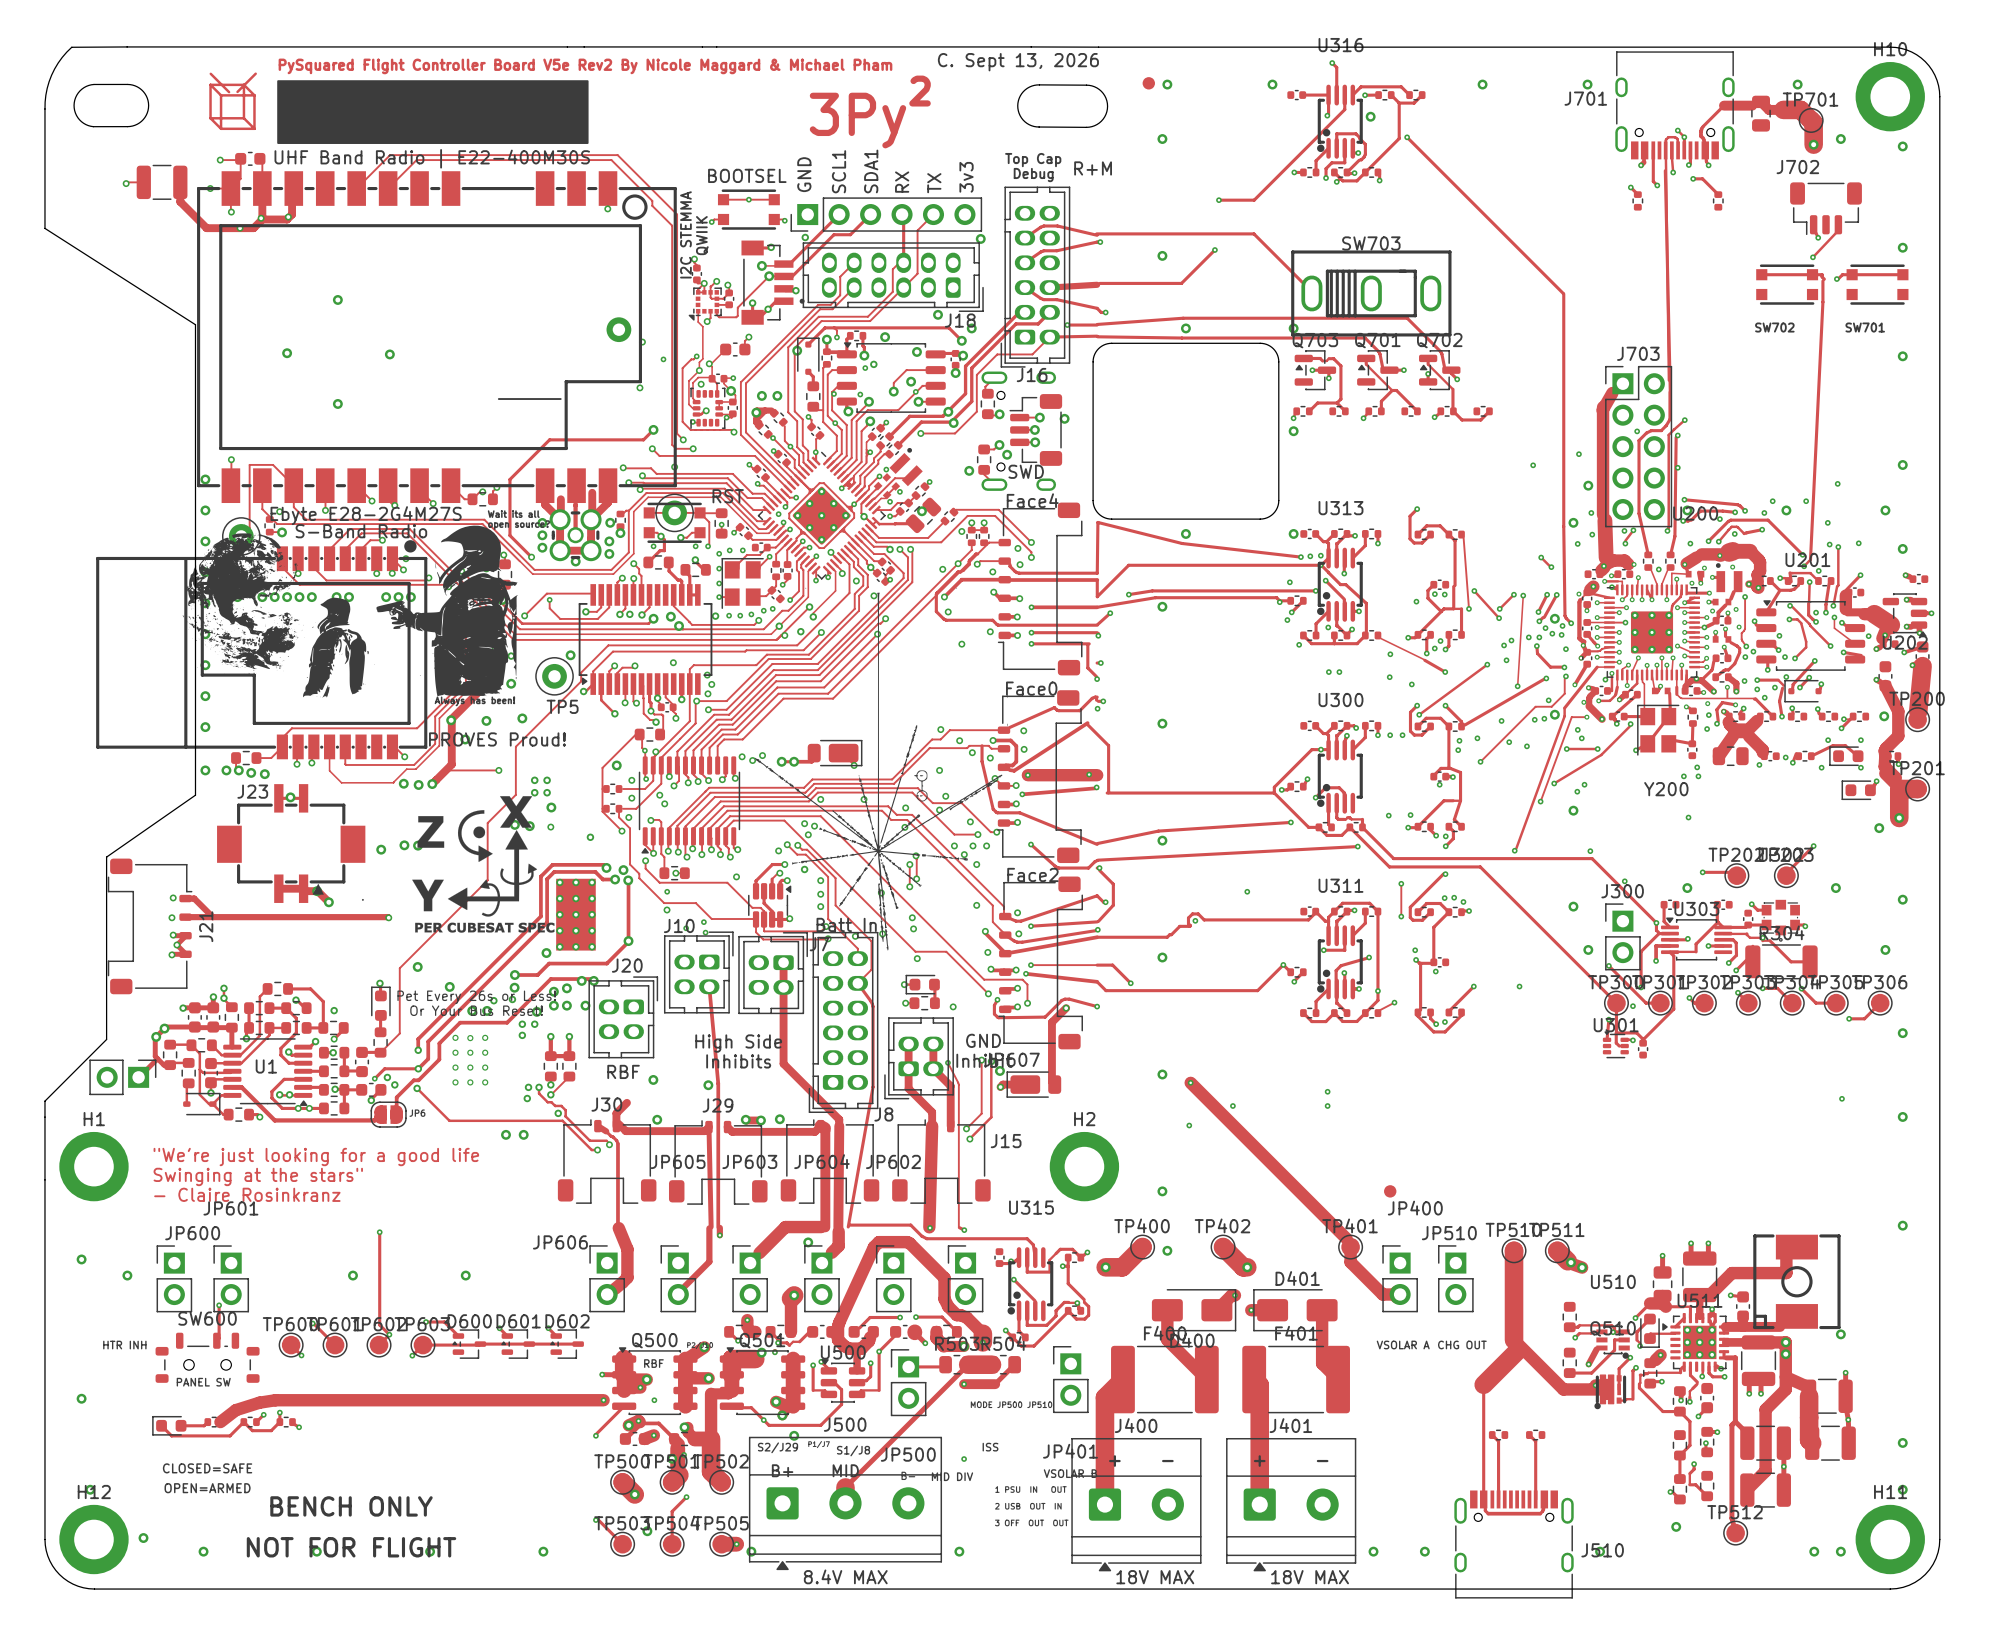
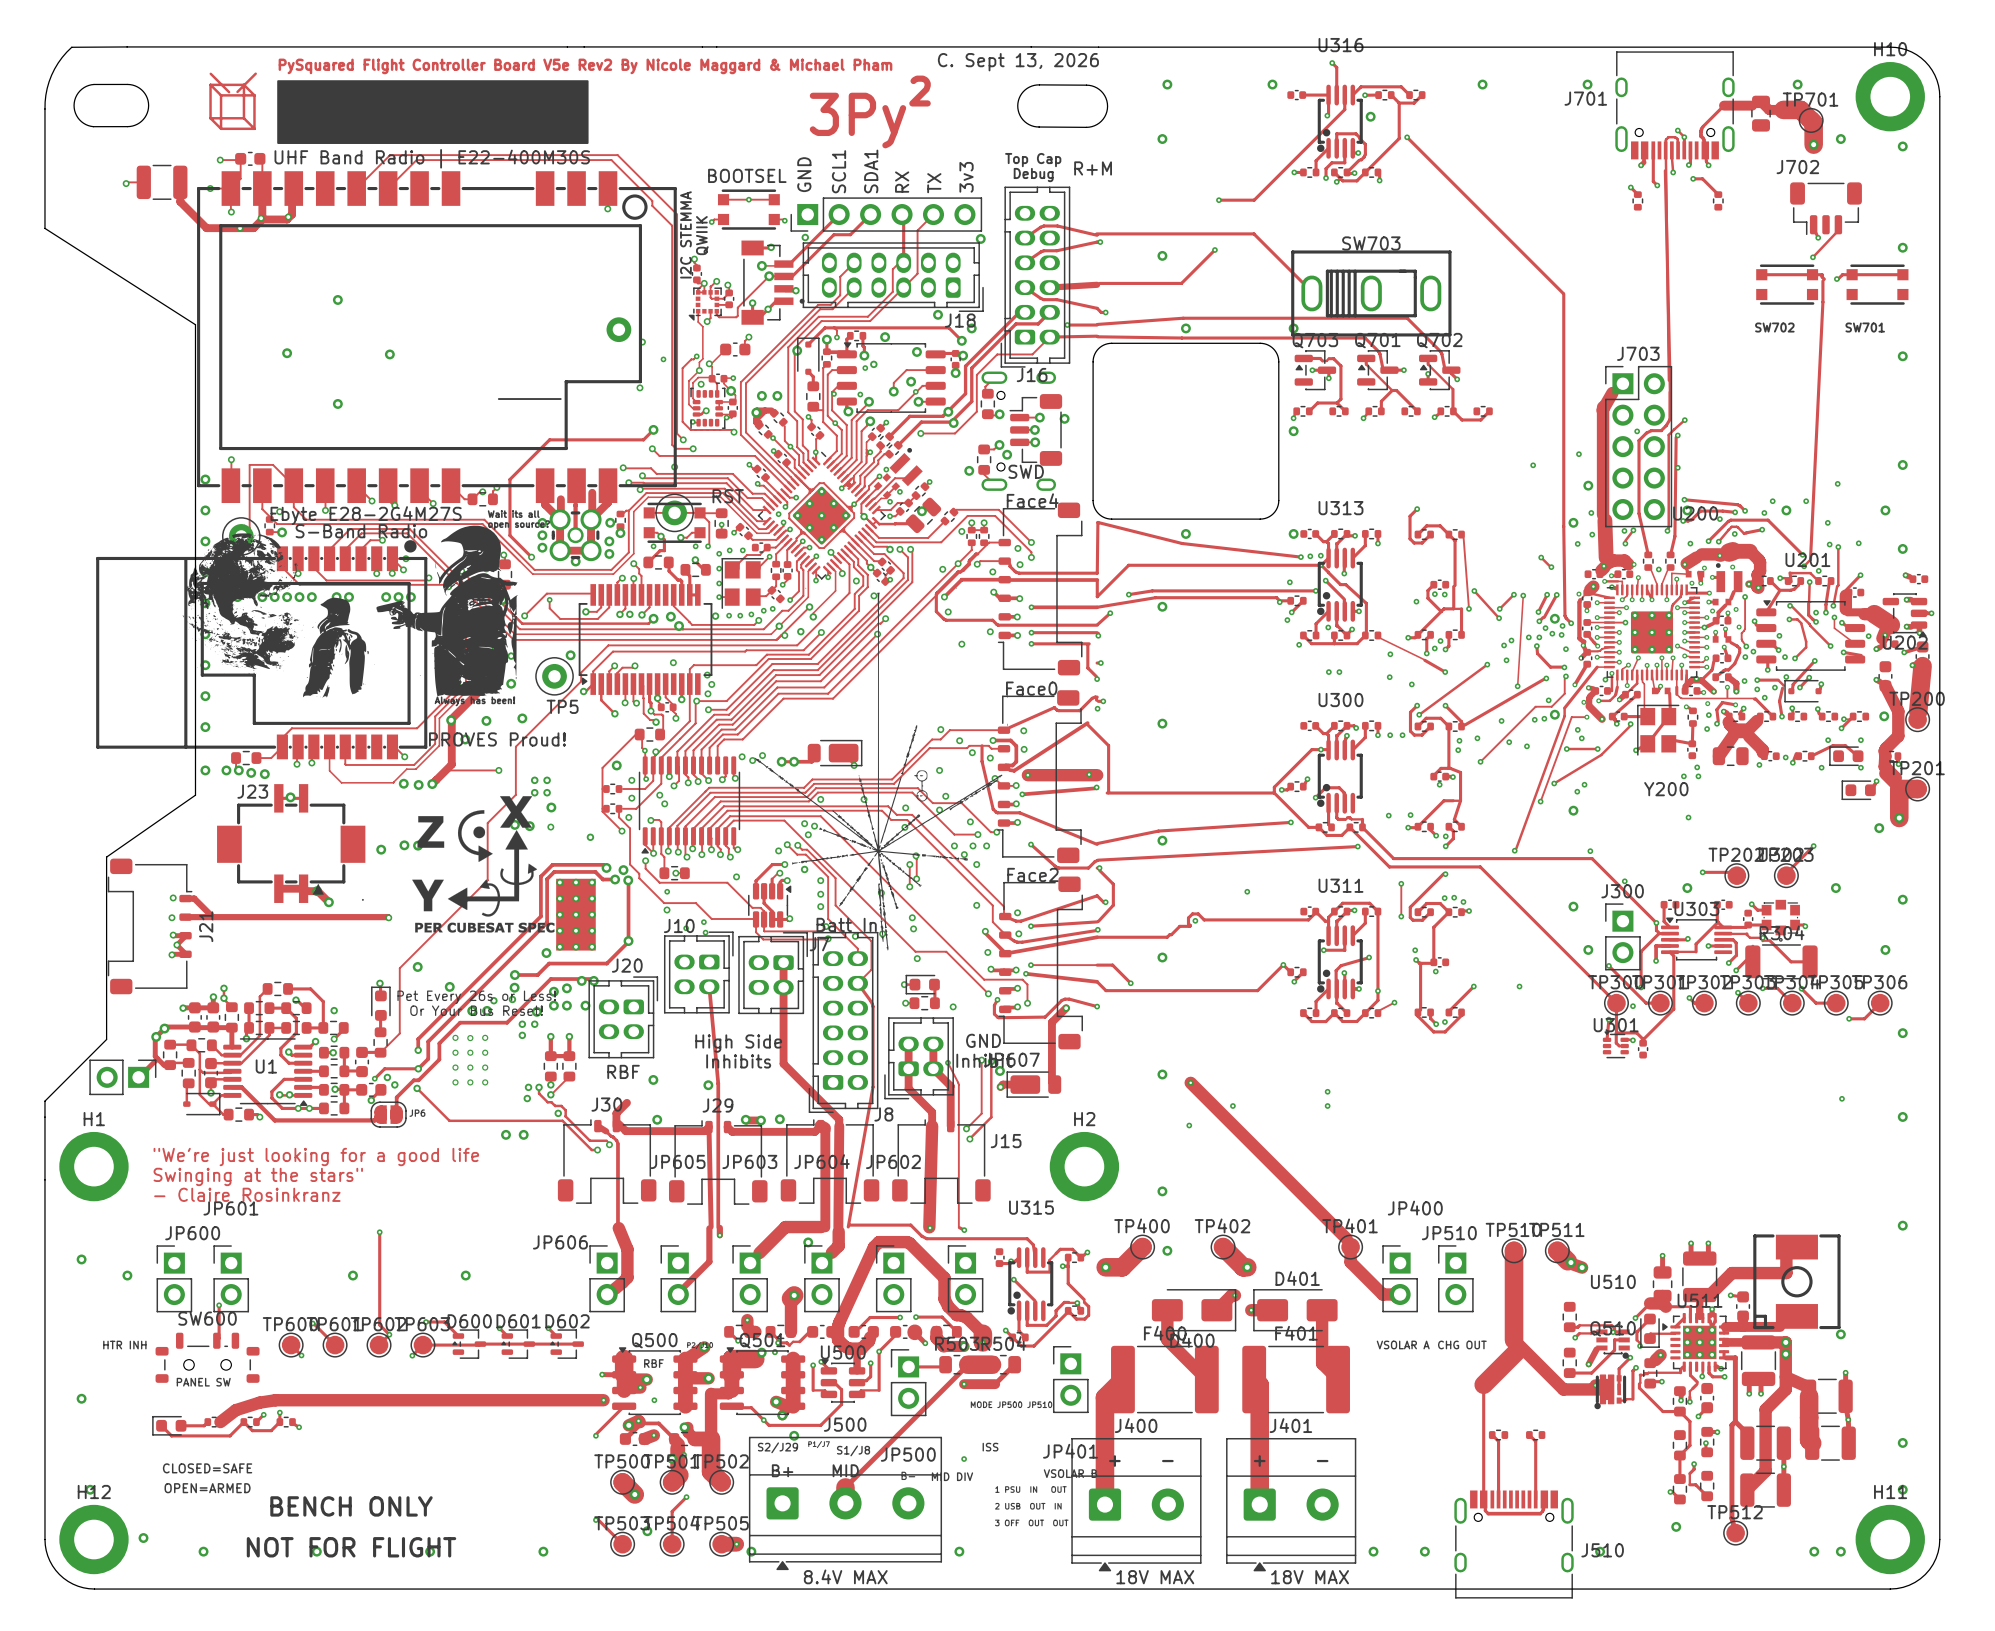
part: (1148, 83) -> none
part: (1390, 1191) -> none

